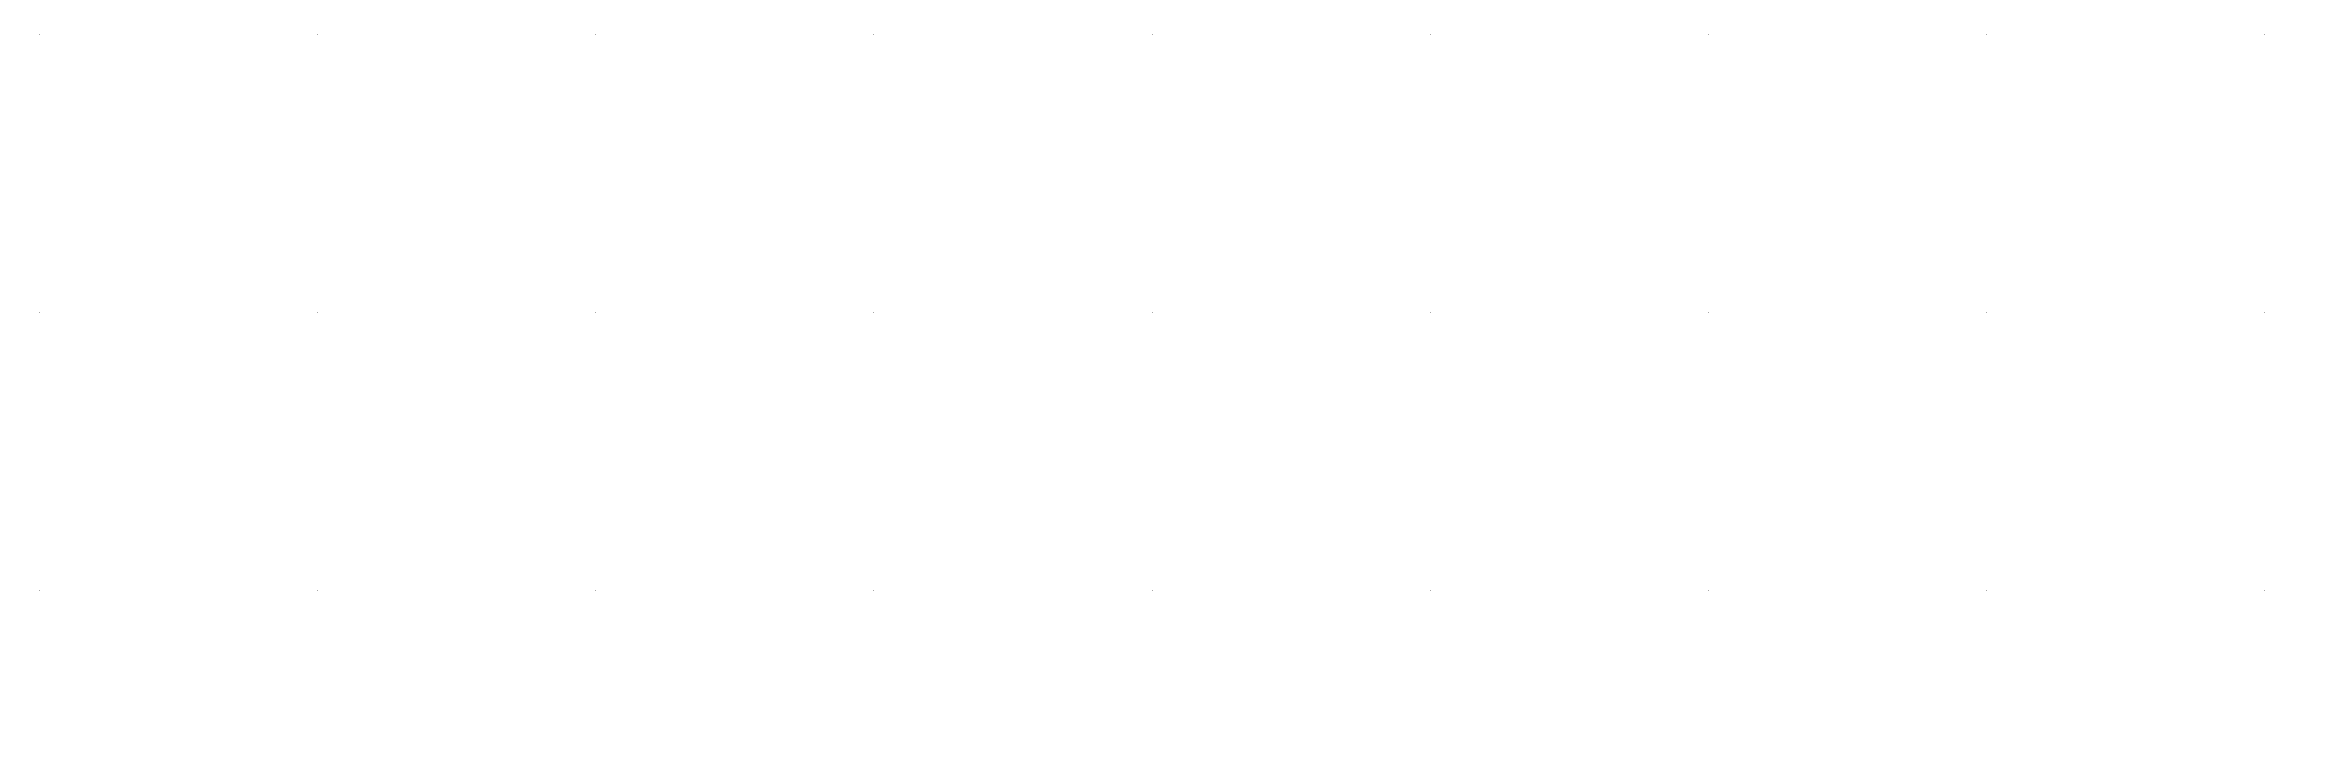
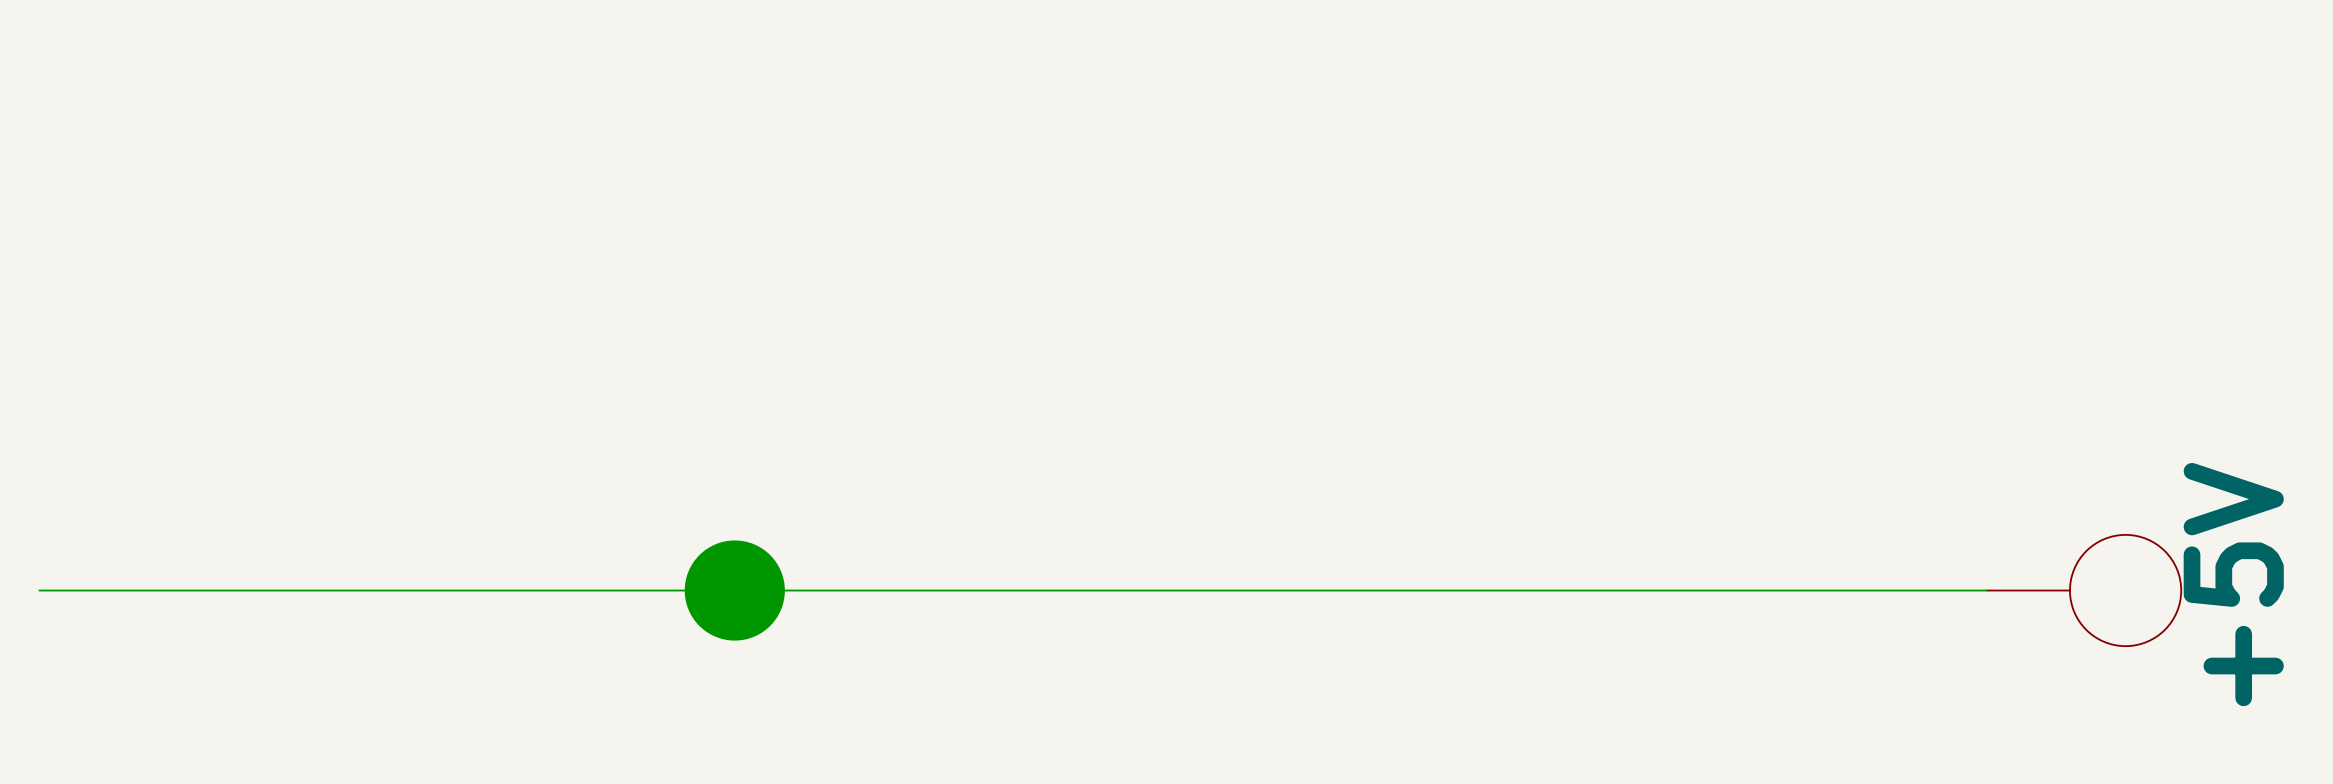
wire: none -> (39, 590) (1986, 590)
junction: none -> (734, 590)
power symbol: none -> +5V (2083, 590)

